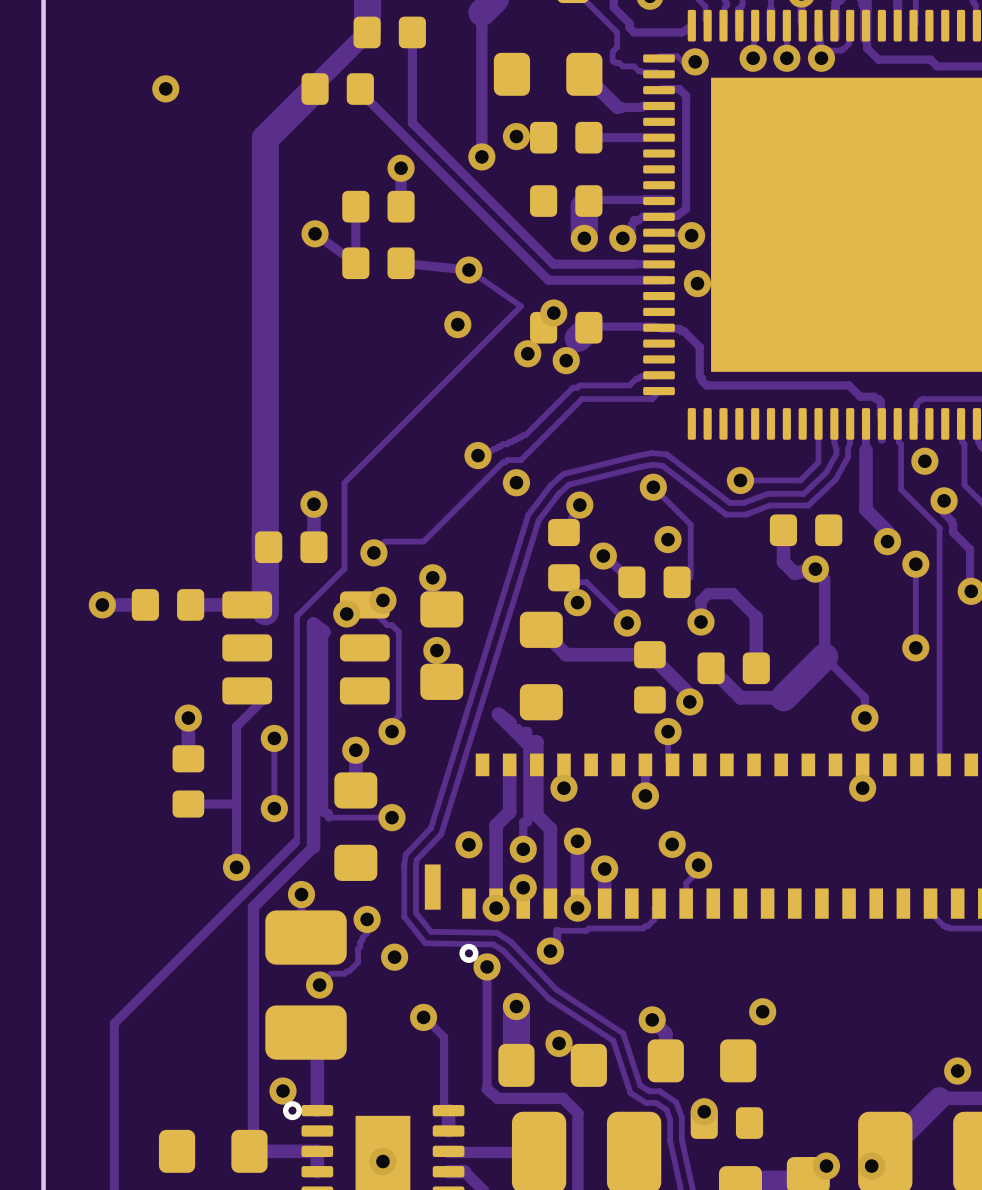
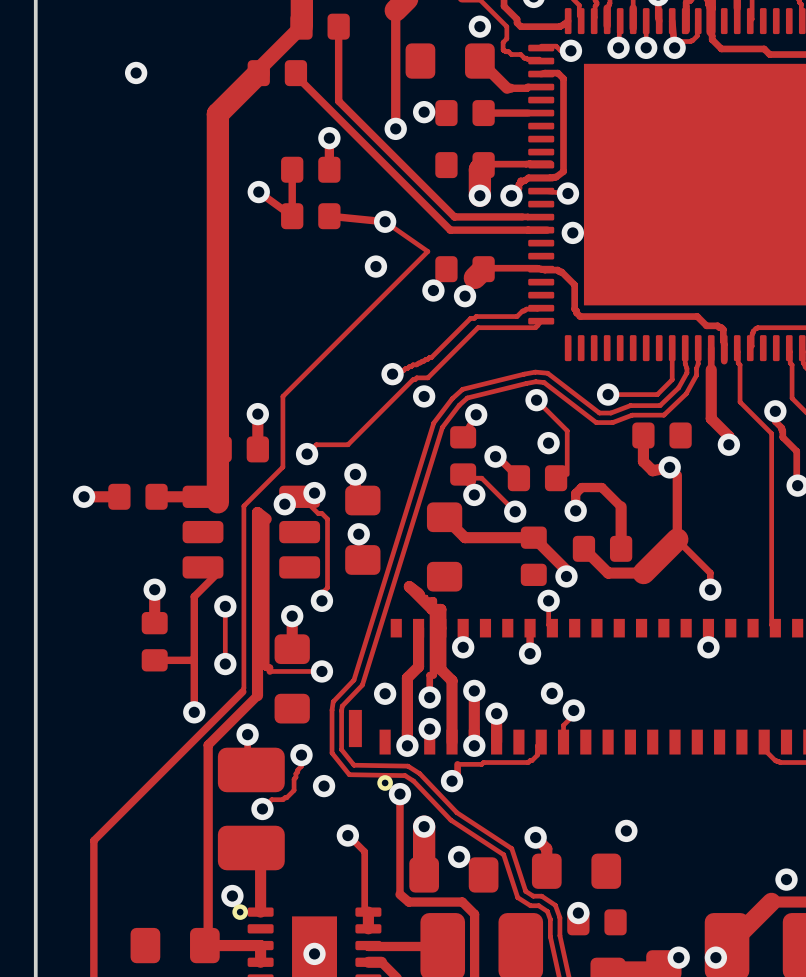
via: none -> (479, 26)
via: (553, 313) -> none
via: (924, 461) -> none
track: (915, 564) (915, 647) -> none
via: (915, 564) -> none
via: (915, 647) -> none

